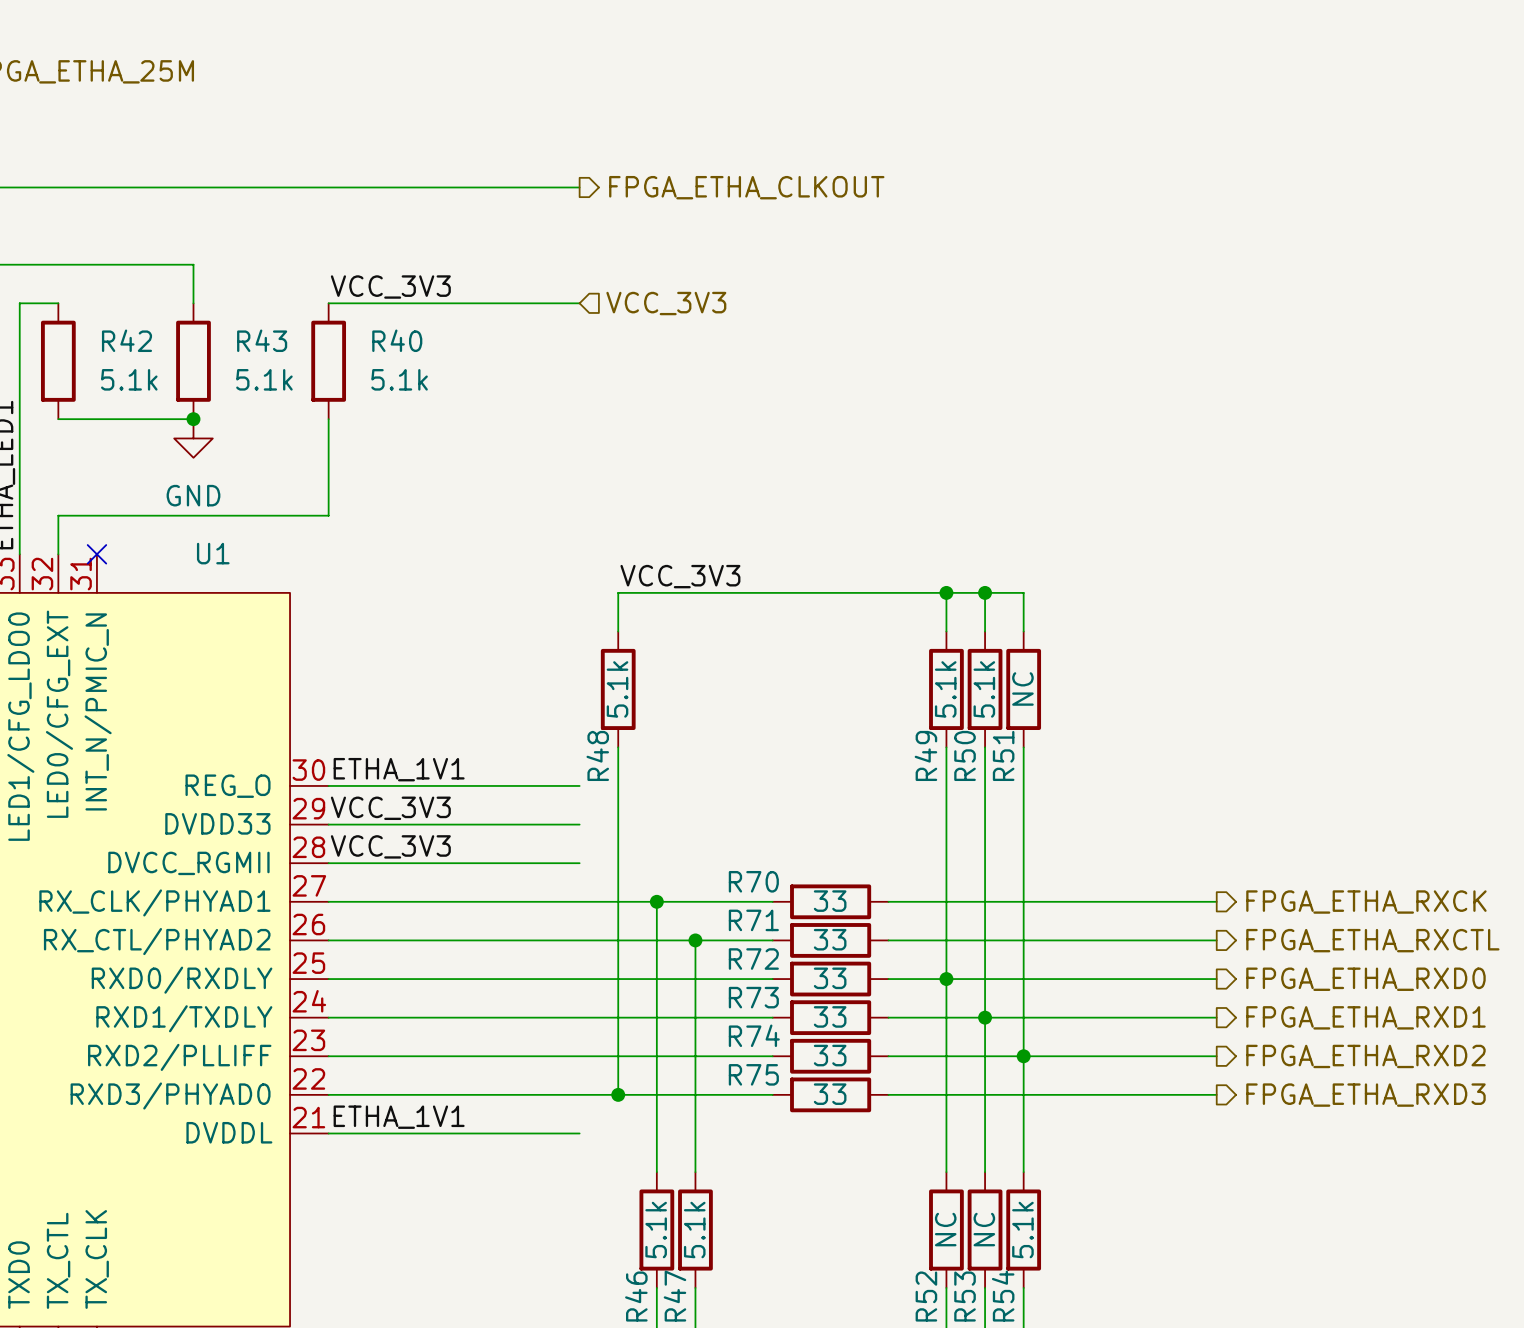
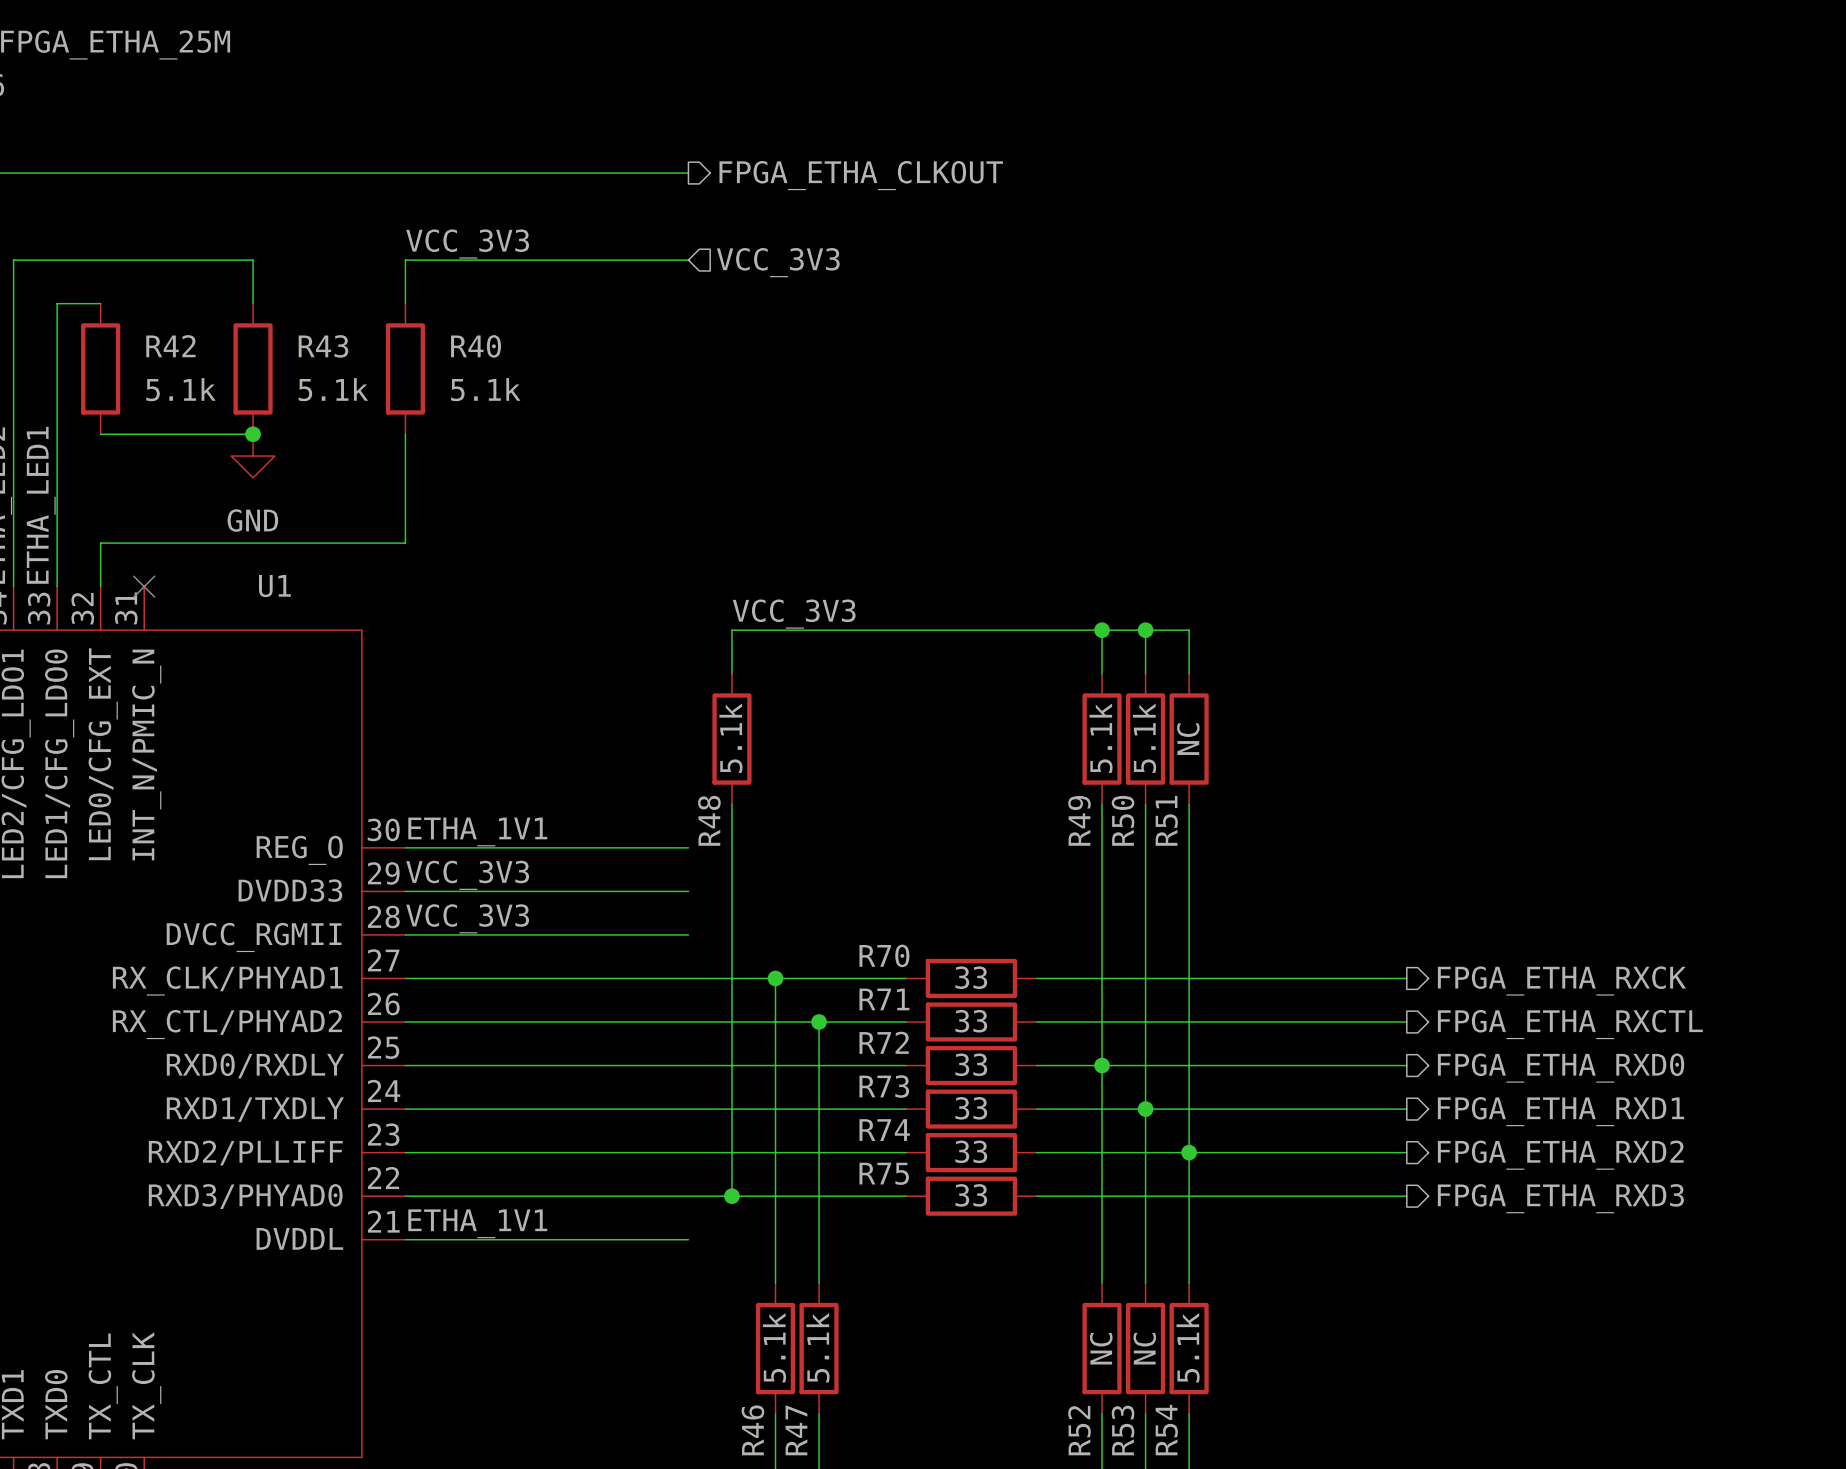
label position: VCC_3V3 (390, 287) -> VCC_3V3 (467, 244)
wire: (328, 303) (579, 303) -> (405, 303) (405, 260) (688, 260)
hierarchical label position: VCC_3V3 (666, 303) -> VCC_3V3 (778, 262)

